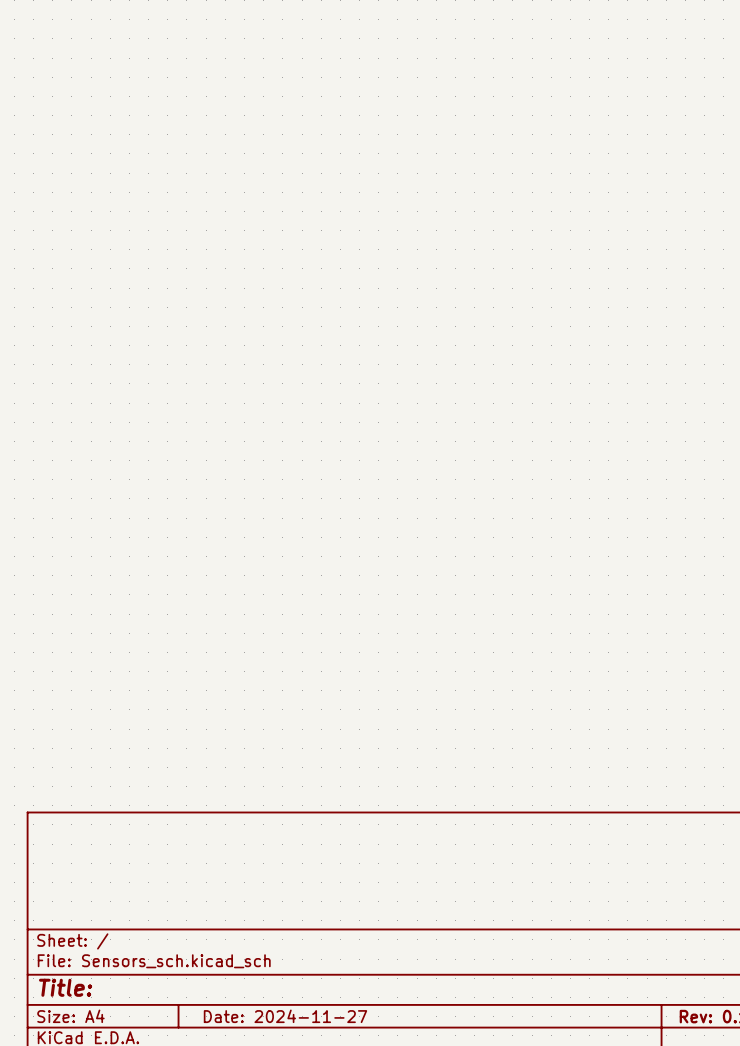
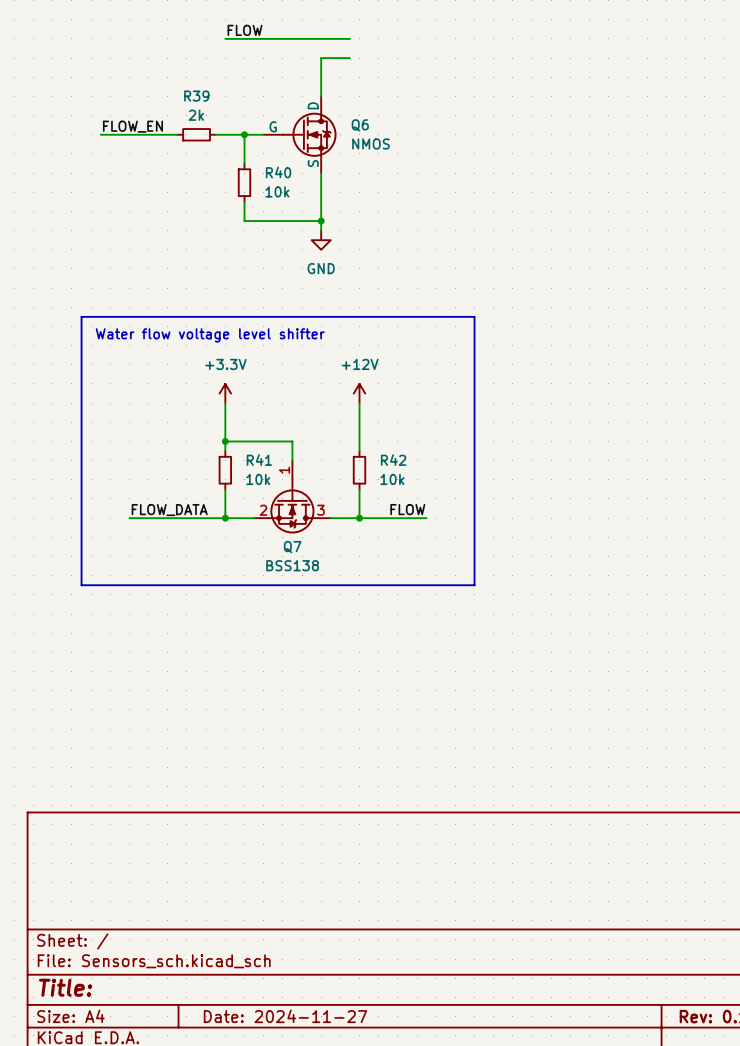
label: none -> FLOW (245, 30)
wire: none -> (225, 38) (349, 38)
wire: none -> (349, 58) (321, 58) (321, 96)
label: none -> FLOW_EN (132, 126)
wire: none -> (100, 134) (177, 134)
R39: none -> 2k (196, 134)
wire: none -> (215, 134) (263, 134)
wire: none -> (244, 134) (244, 163)
junction: none -> (244, 134)
Q6: none -> NMOS (300, 134)
wire: none -> (321, 173) (321, 230)
R40: none -> 10k (244, 182)
wire: none -> (244, 201) (244, 221) (321, 221)
junction: none -> (321, 221)
power symbol: none -> GND (321, 240)
line: none -> (81, 316) (474, 316) (474, 585) (81, 585) (81, 316)
text: none -> Water flow voltage level shifter (210, 335)
power symbol: none -> +3.3V (225, 393)
power symbol: none -> +12V (359, 393)
wire: none -> (225, 403) (225, 451)
wire: none -> (359, 403) (359, 451)
wire: none -> (225, 441) (292, 441) (292, 460)
junction: none -> (225, 441)
R41: none -> 10k (225, 470)
R42: none -> 10k (359, 470)
wire: none -> (225, 489) (225, 518)
wire: none -> (359, 489) (359, 518)
Q7: none -> BSS138 (292, 497)
label: none -> FLOW (407, 509)
label: none -> FLOW_DATA (169, 510)
wire: none -> (129, 518) (254, 518)
junction: none -> (225, 518)
wire: none -> (330, 518) (426, 518)
junction: none -> (359, 518)

